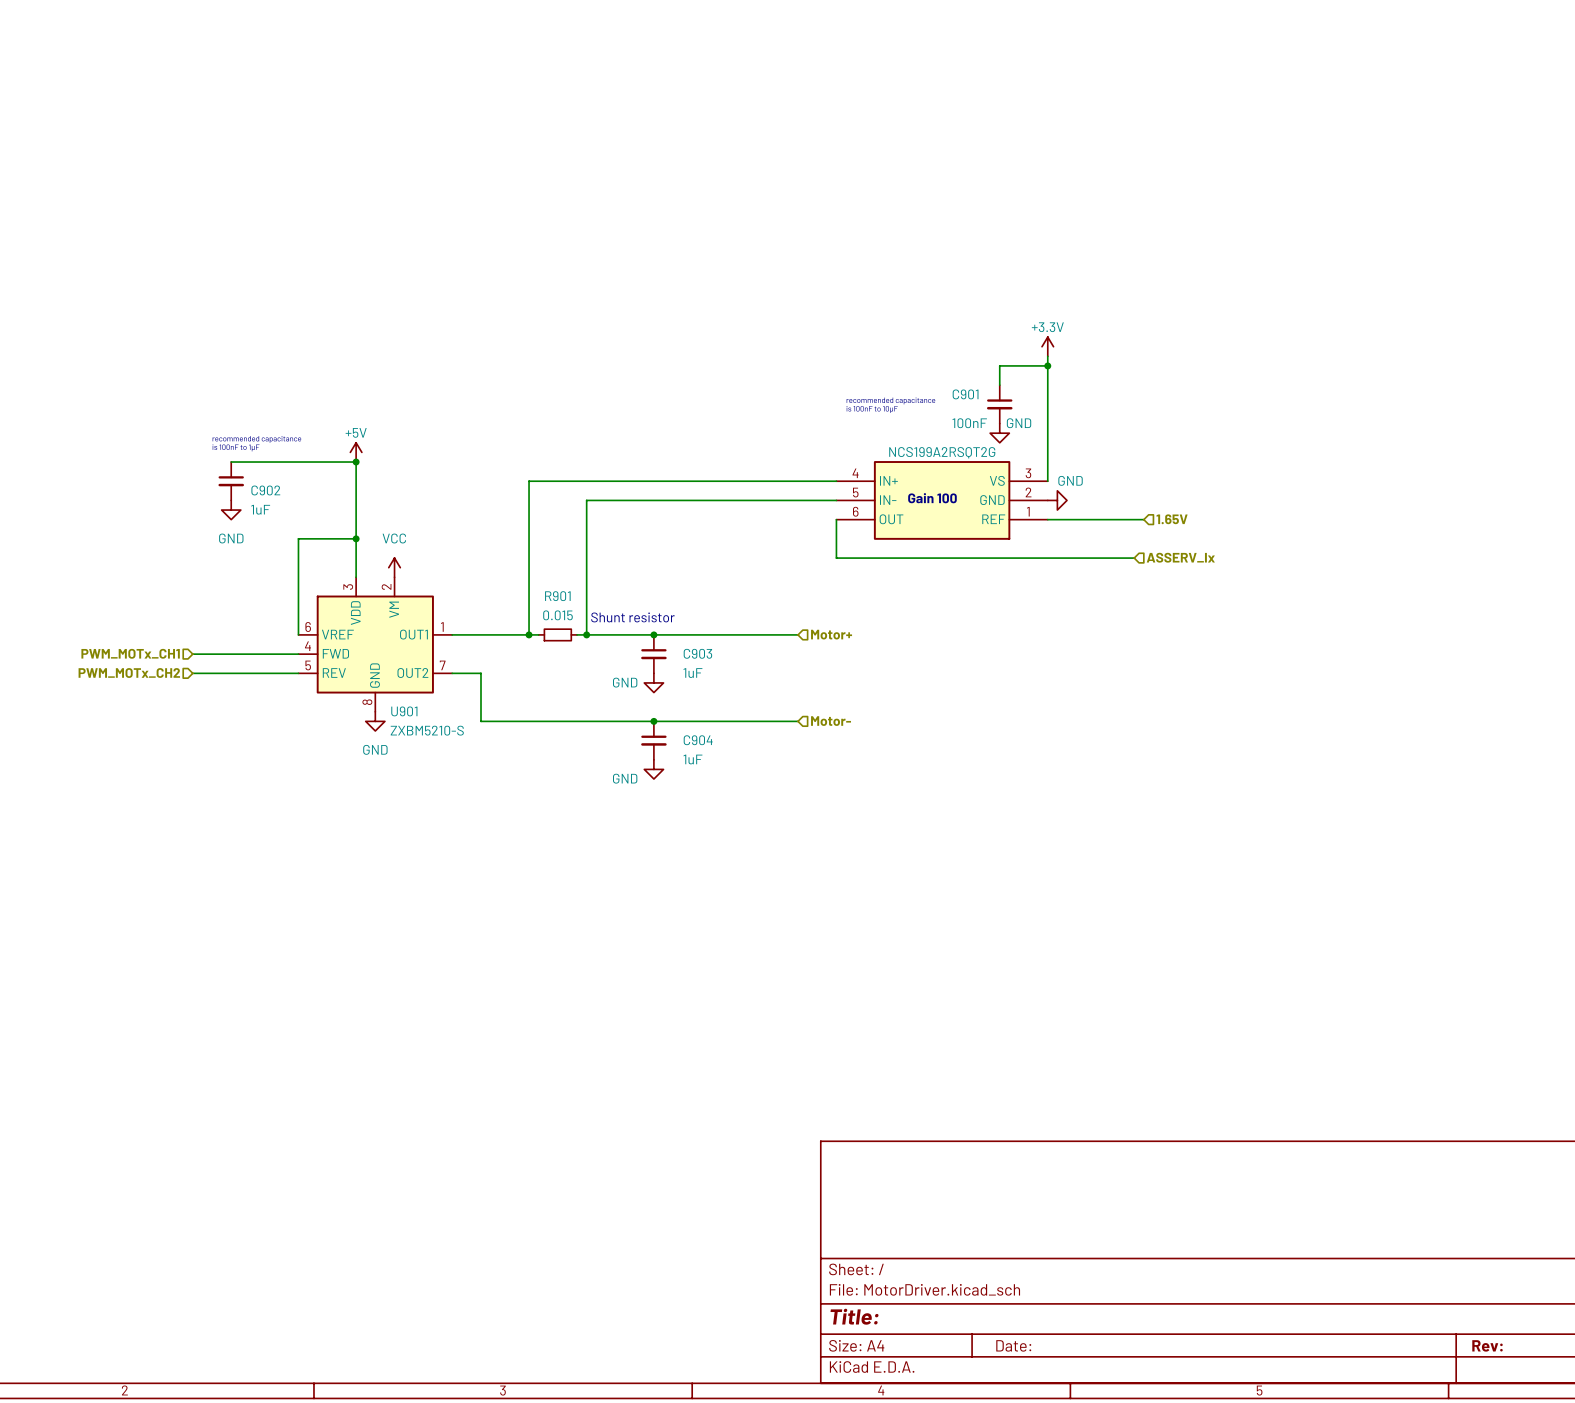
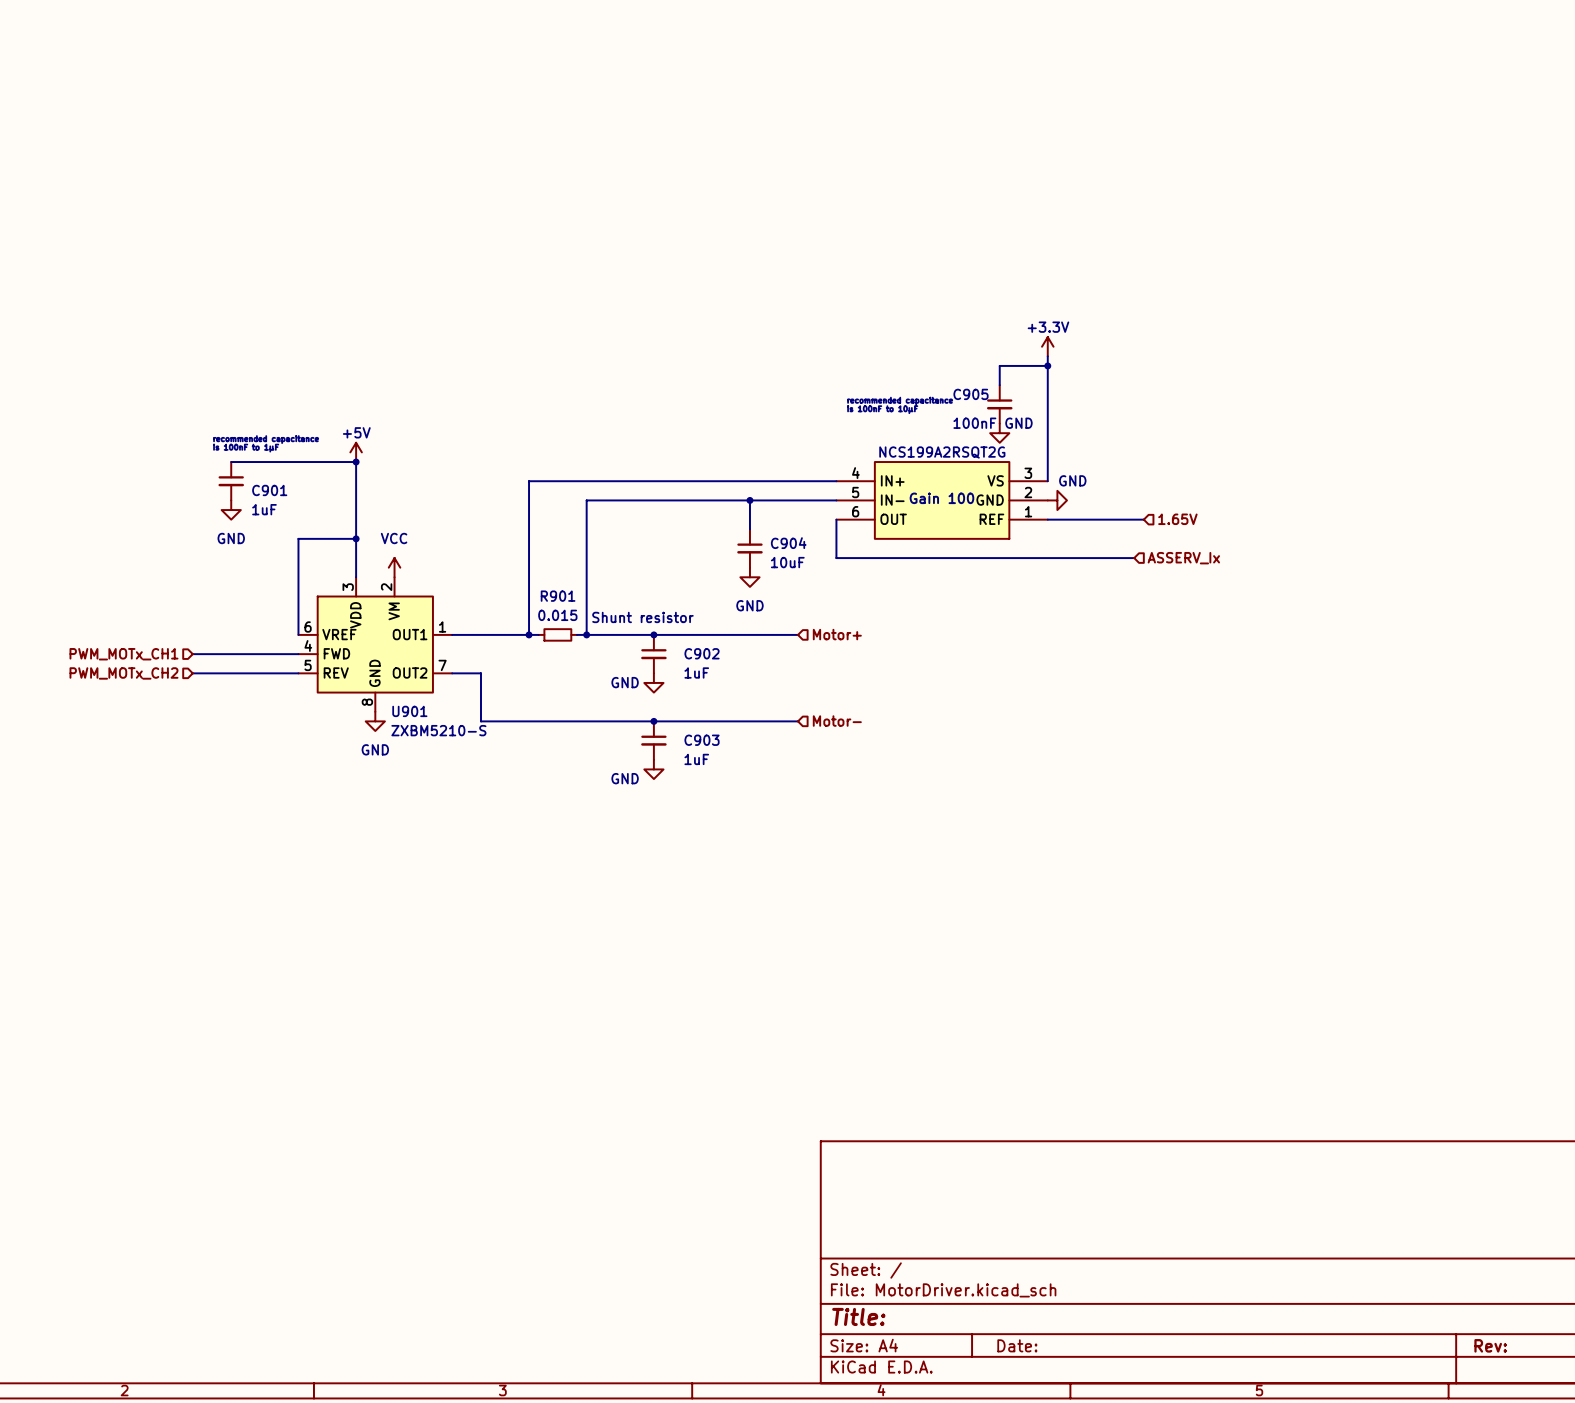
C901 name: C901 (965, 394) -> C905 (971, 394)
C902 name: C902 (265, 490) -> C901 (269, 490)
wire: none -> (749, 500) (749, 529)
junction: none -> (749, 500)
C904: none -> 10uF (749, 548)
power symbol: none -> GND (749, 577)
C903 name: C903 (697, 653) -> C902 (702, 653)
C904 name: C904 (698, 740) -> C903 (702, 740)

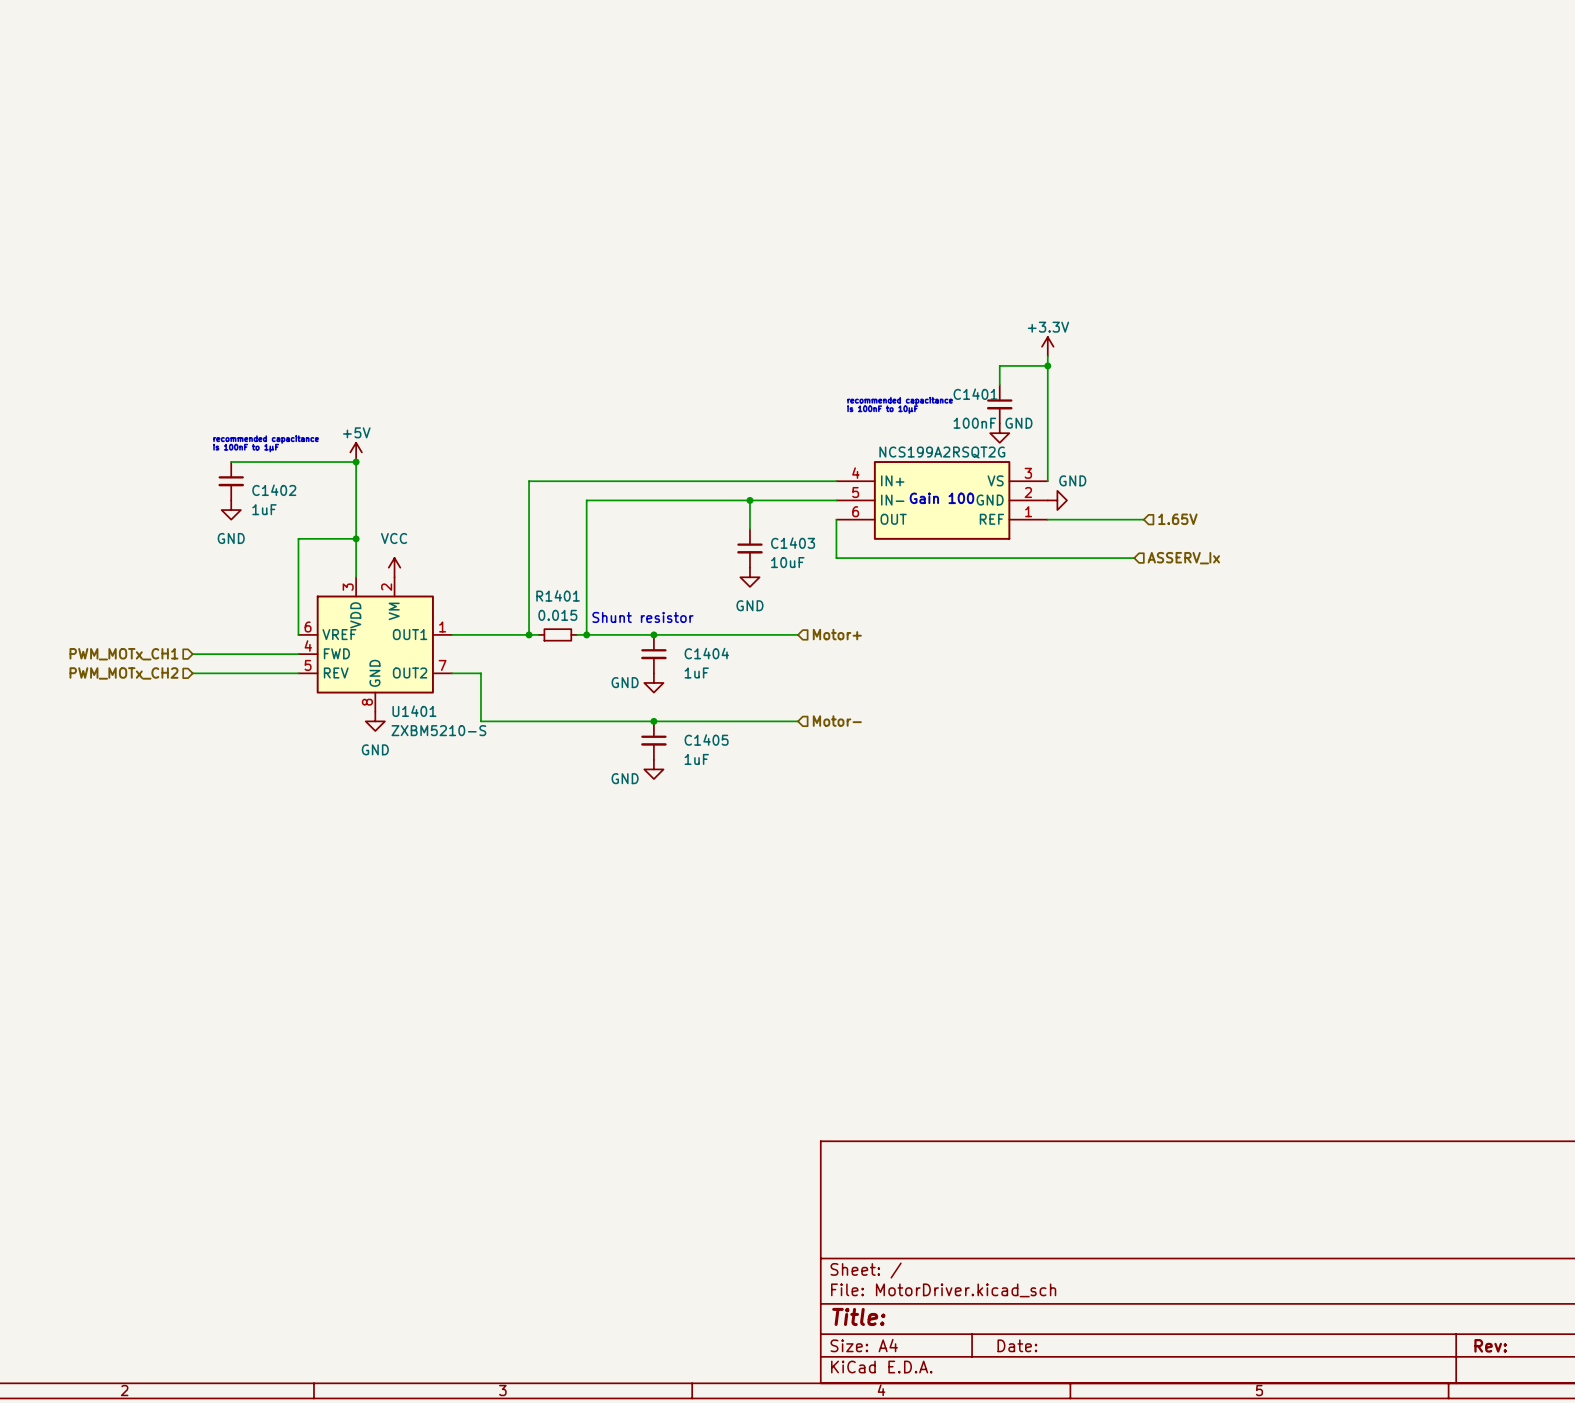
C905 name: C905 (971, 394) -> C1401 (975, 394)
C901 name: C901 (269, 490) -> C1402 (274, 490)
C904 name: C904 (788, 543) -> C1403 (793, 543)
R901 name: R901 (558, 596) -> R1401 (558, 595)
C902 name: C902 (702, 653) -> C1404 (706, 653)
U901 name: U901 (409, 711) -> U1401 (414, 711)
C903 name: C903 (702, 740) -> C1405 (706, 740)

